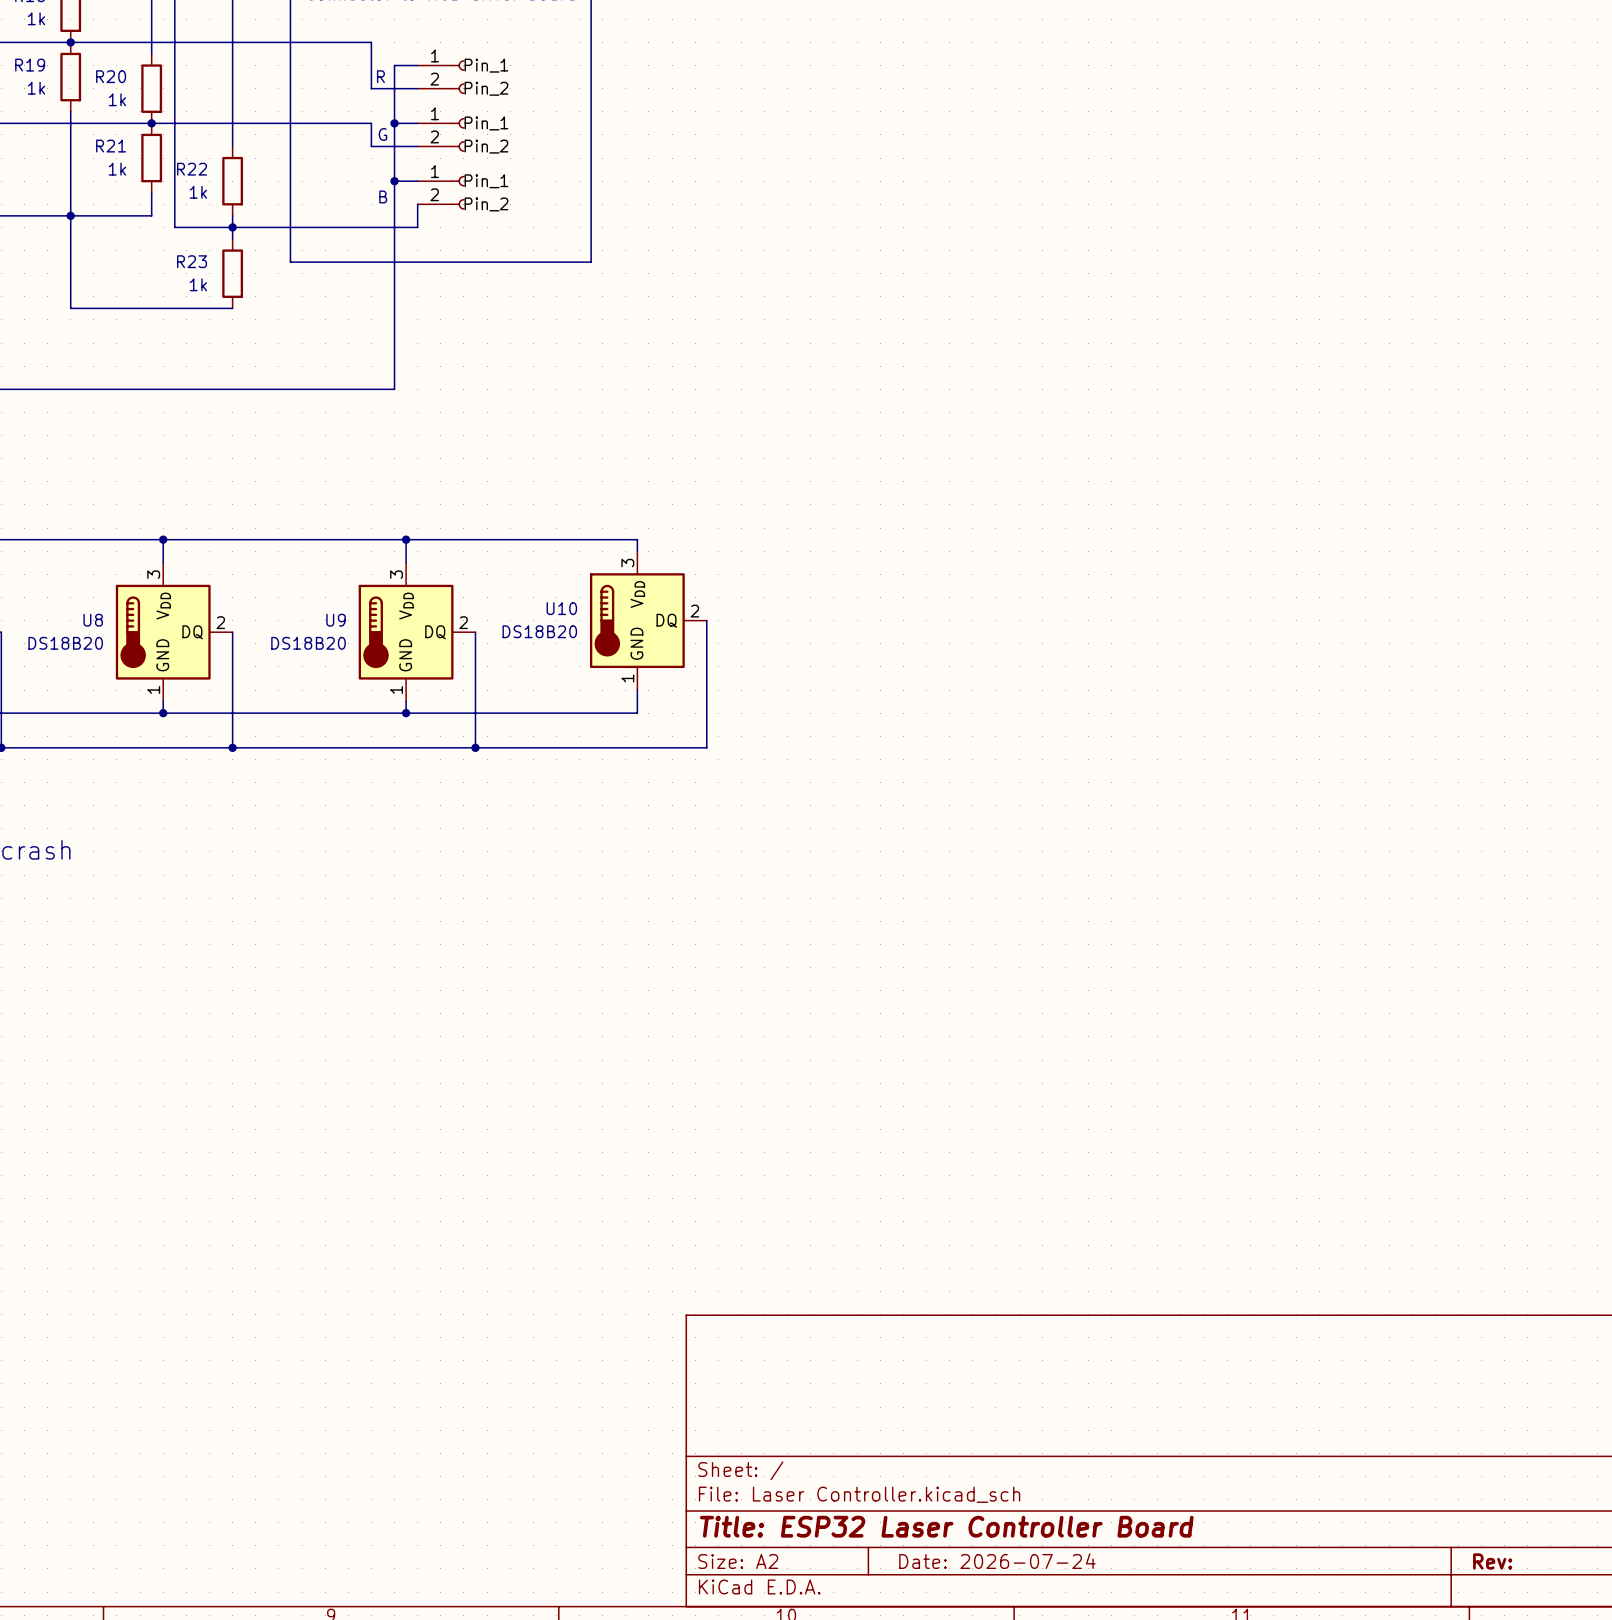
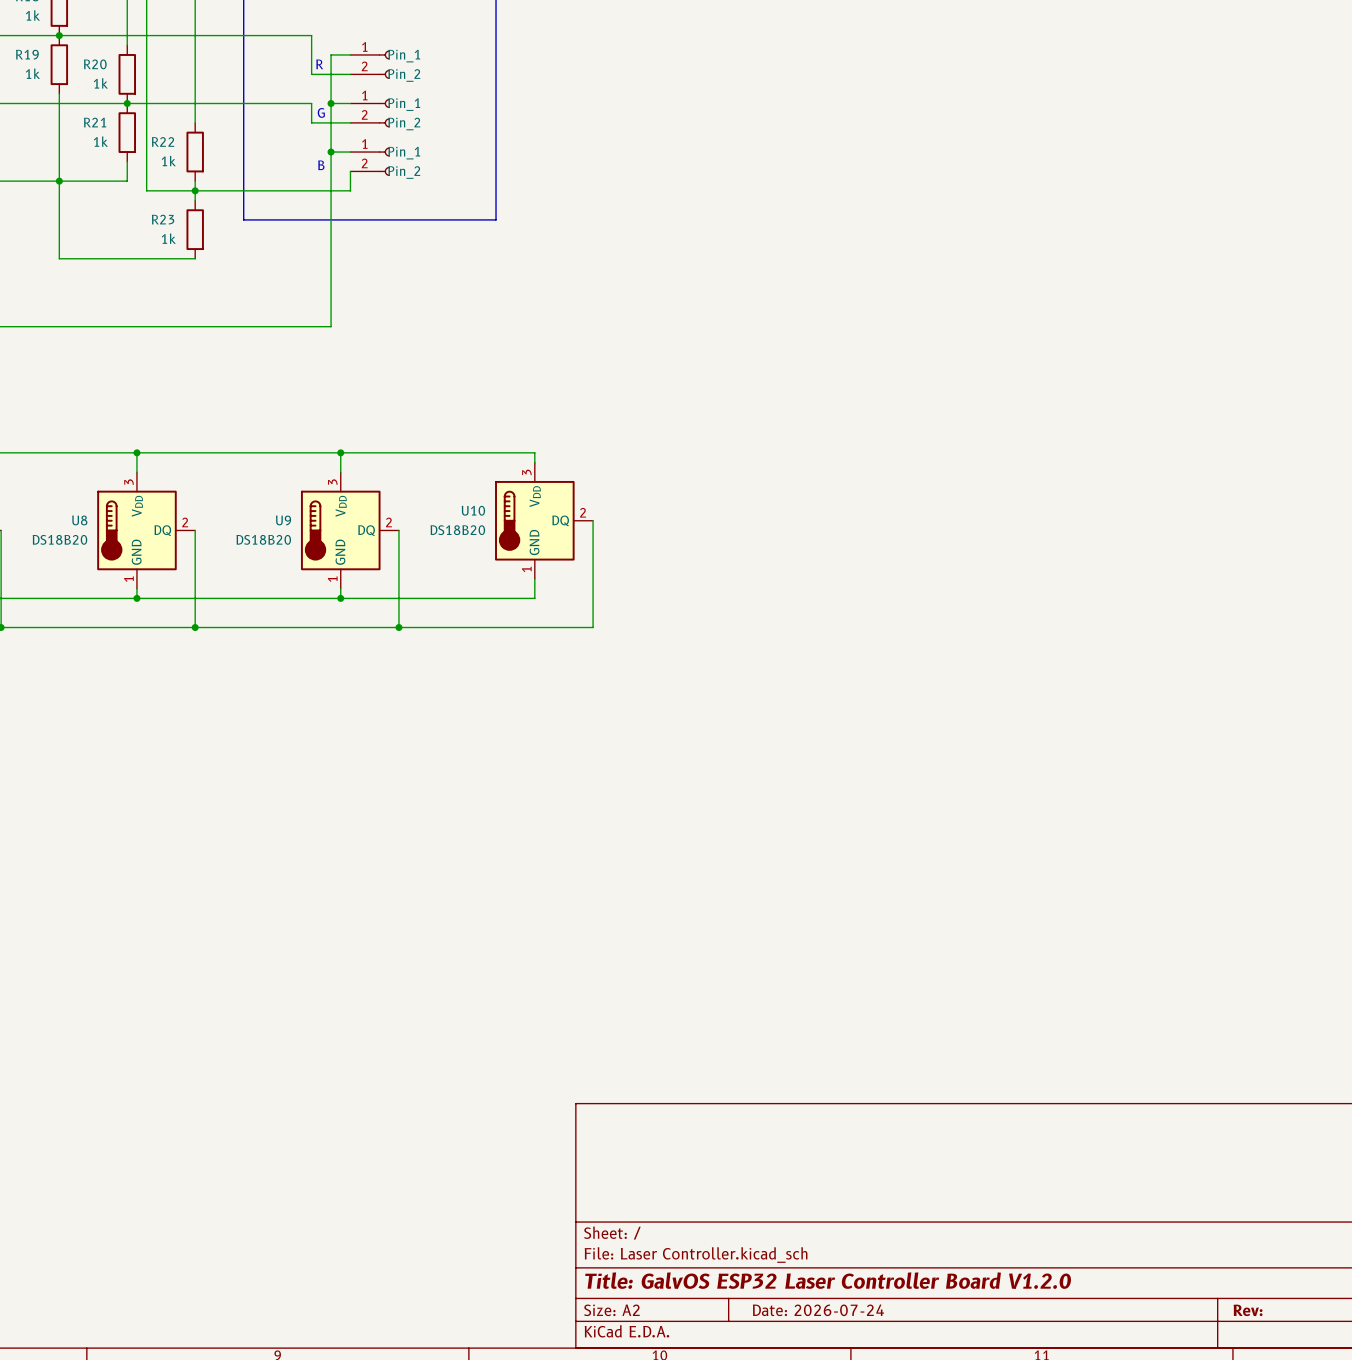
title block: Title: ESP32 Laser Controller Board (946, 1526) -> Title: GalvOS ESP32 Laser Controller Board V1.2.0 (828, 1280)

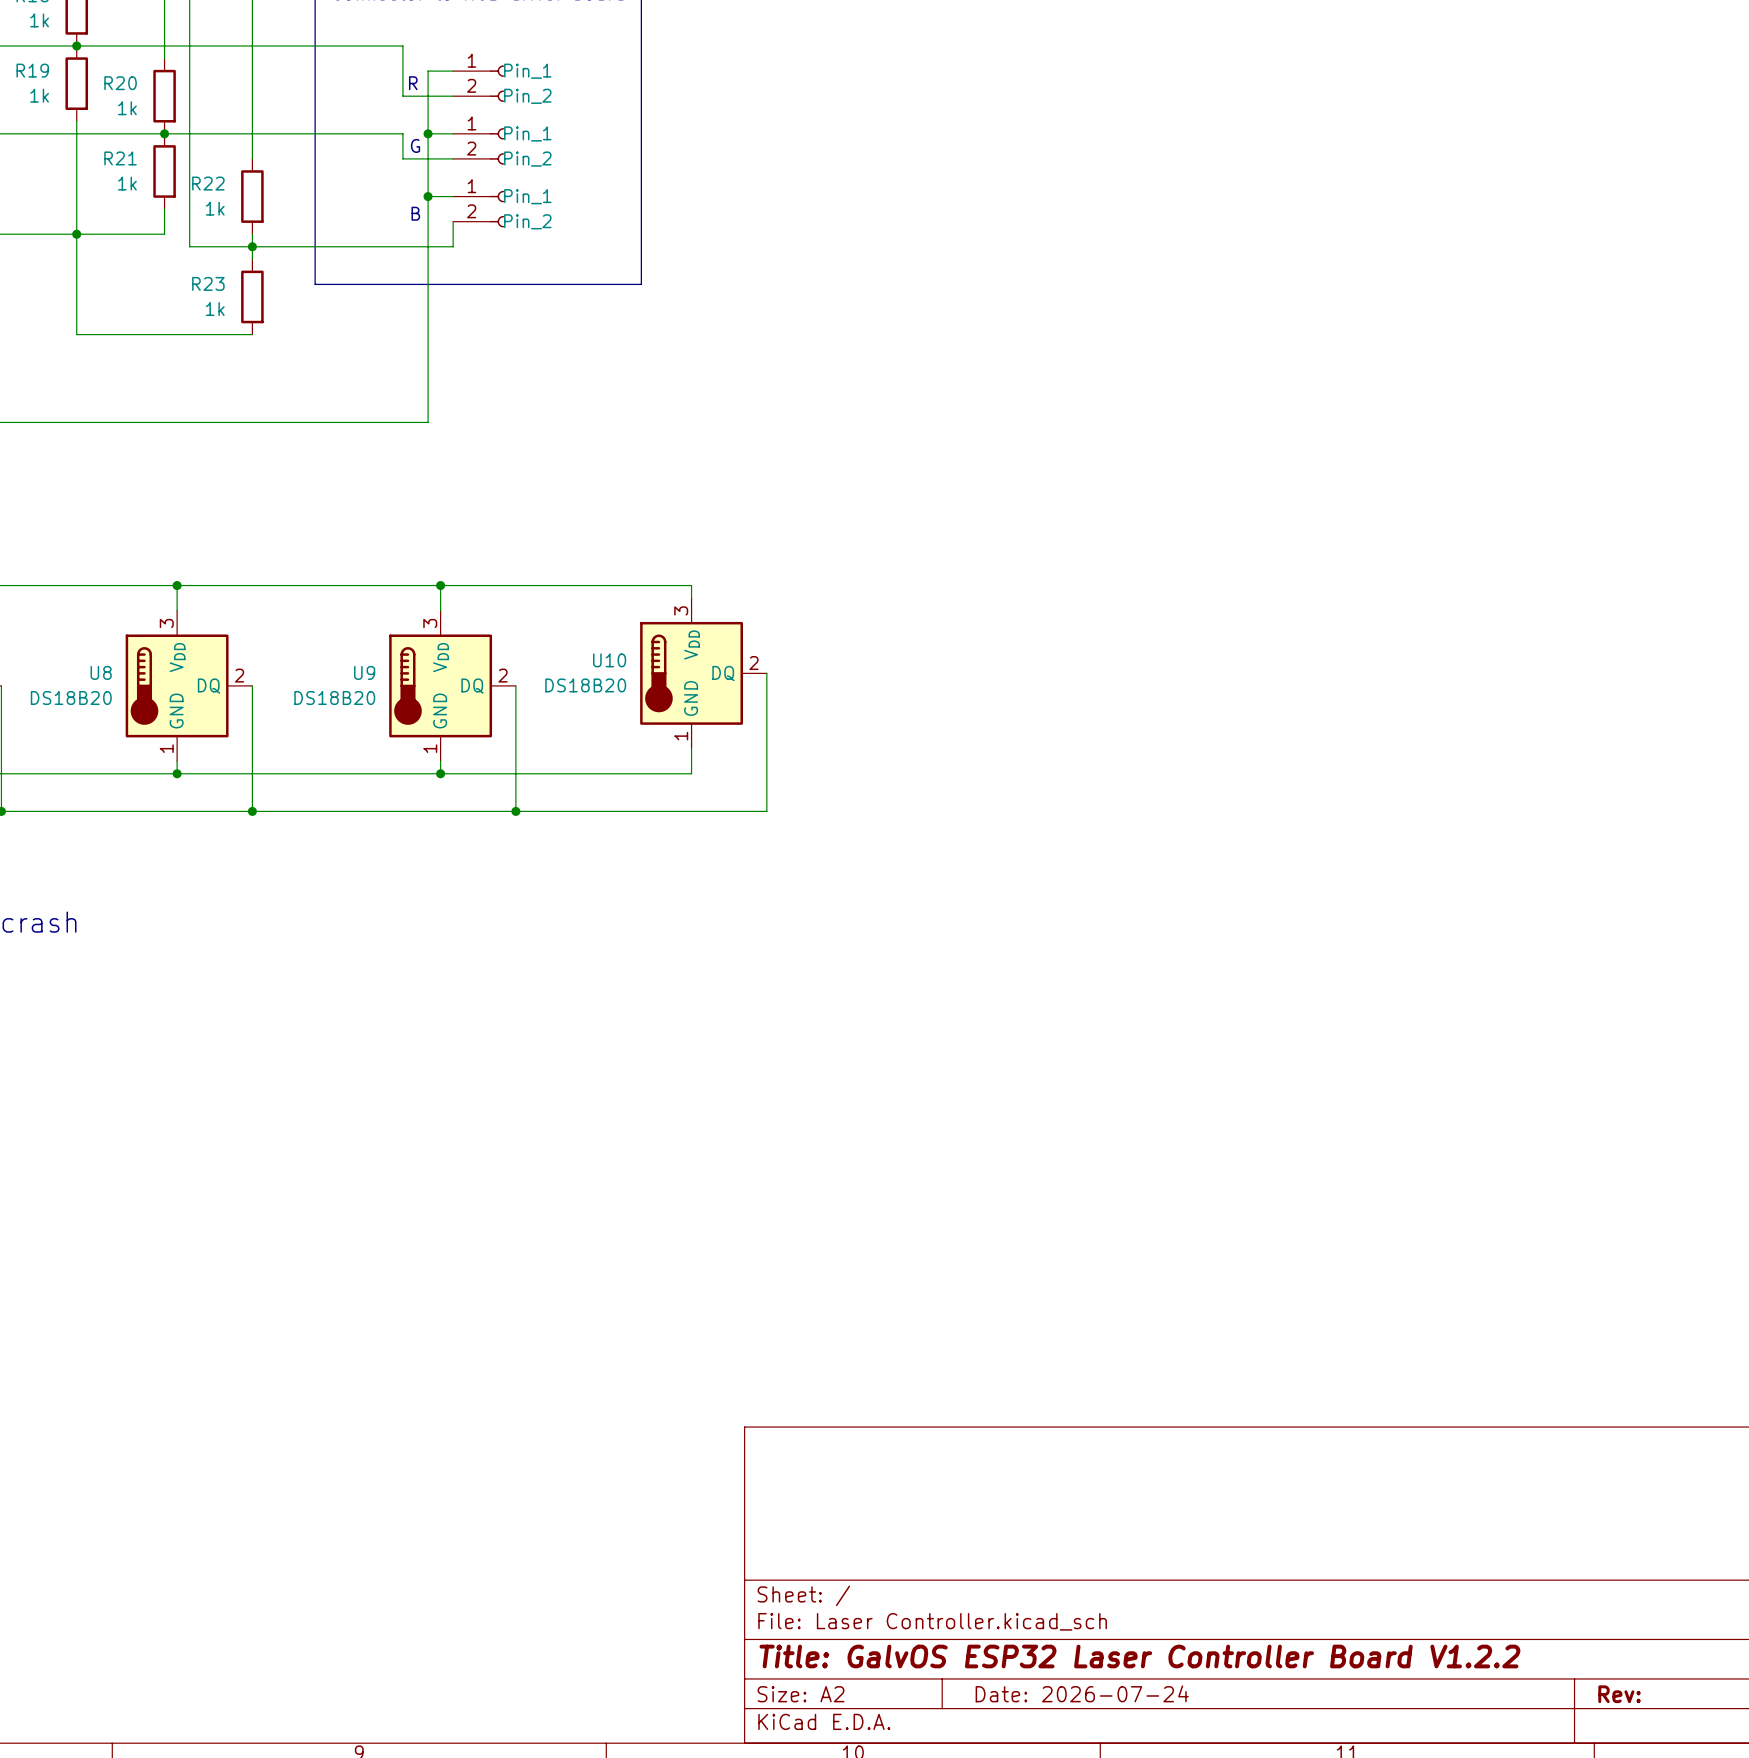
title block: Title: GalvOS ESP32 Laser Controller Board V1.2.0 (828, 1280) -> Title: GalvOS ESP32 Laser Controller Board V1.2.2 (1139, 1656)

